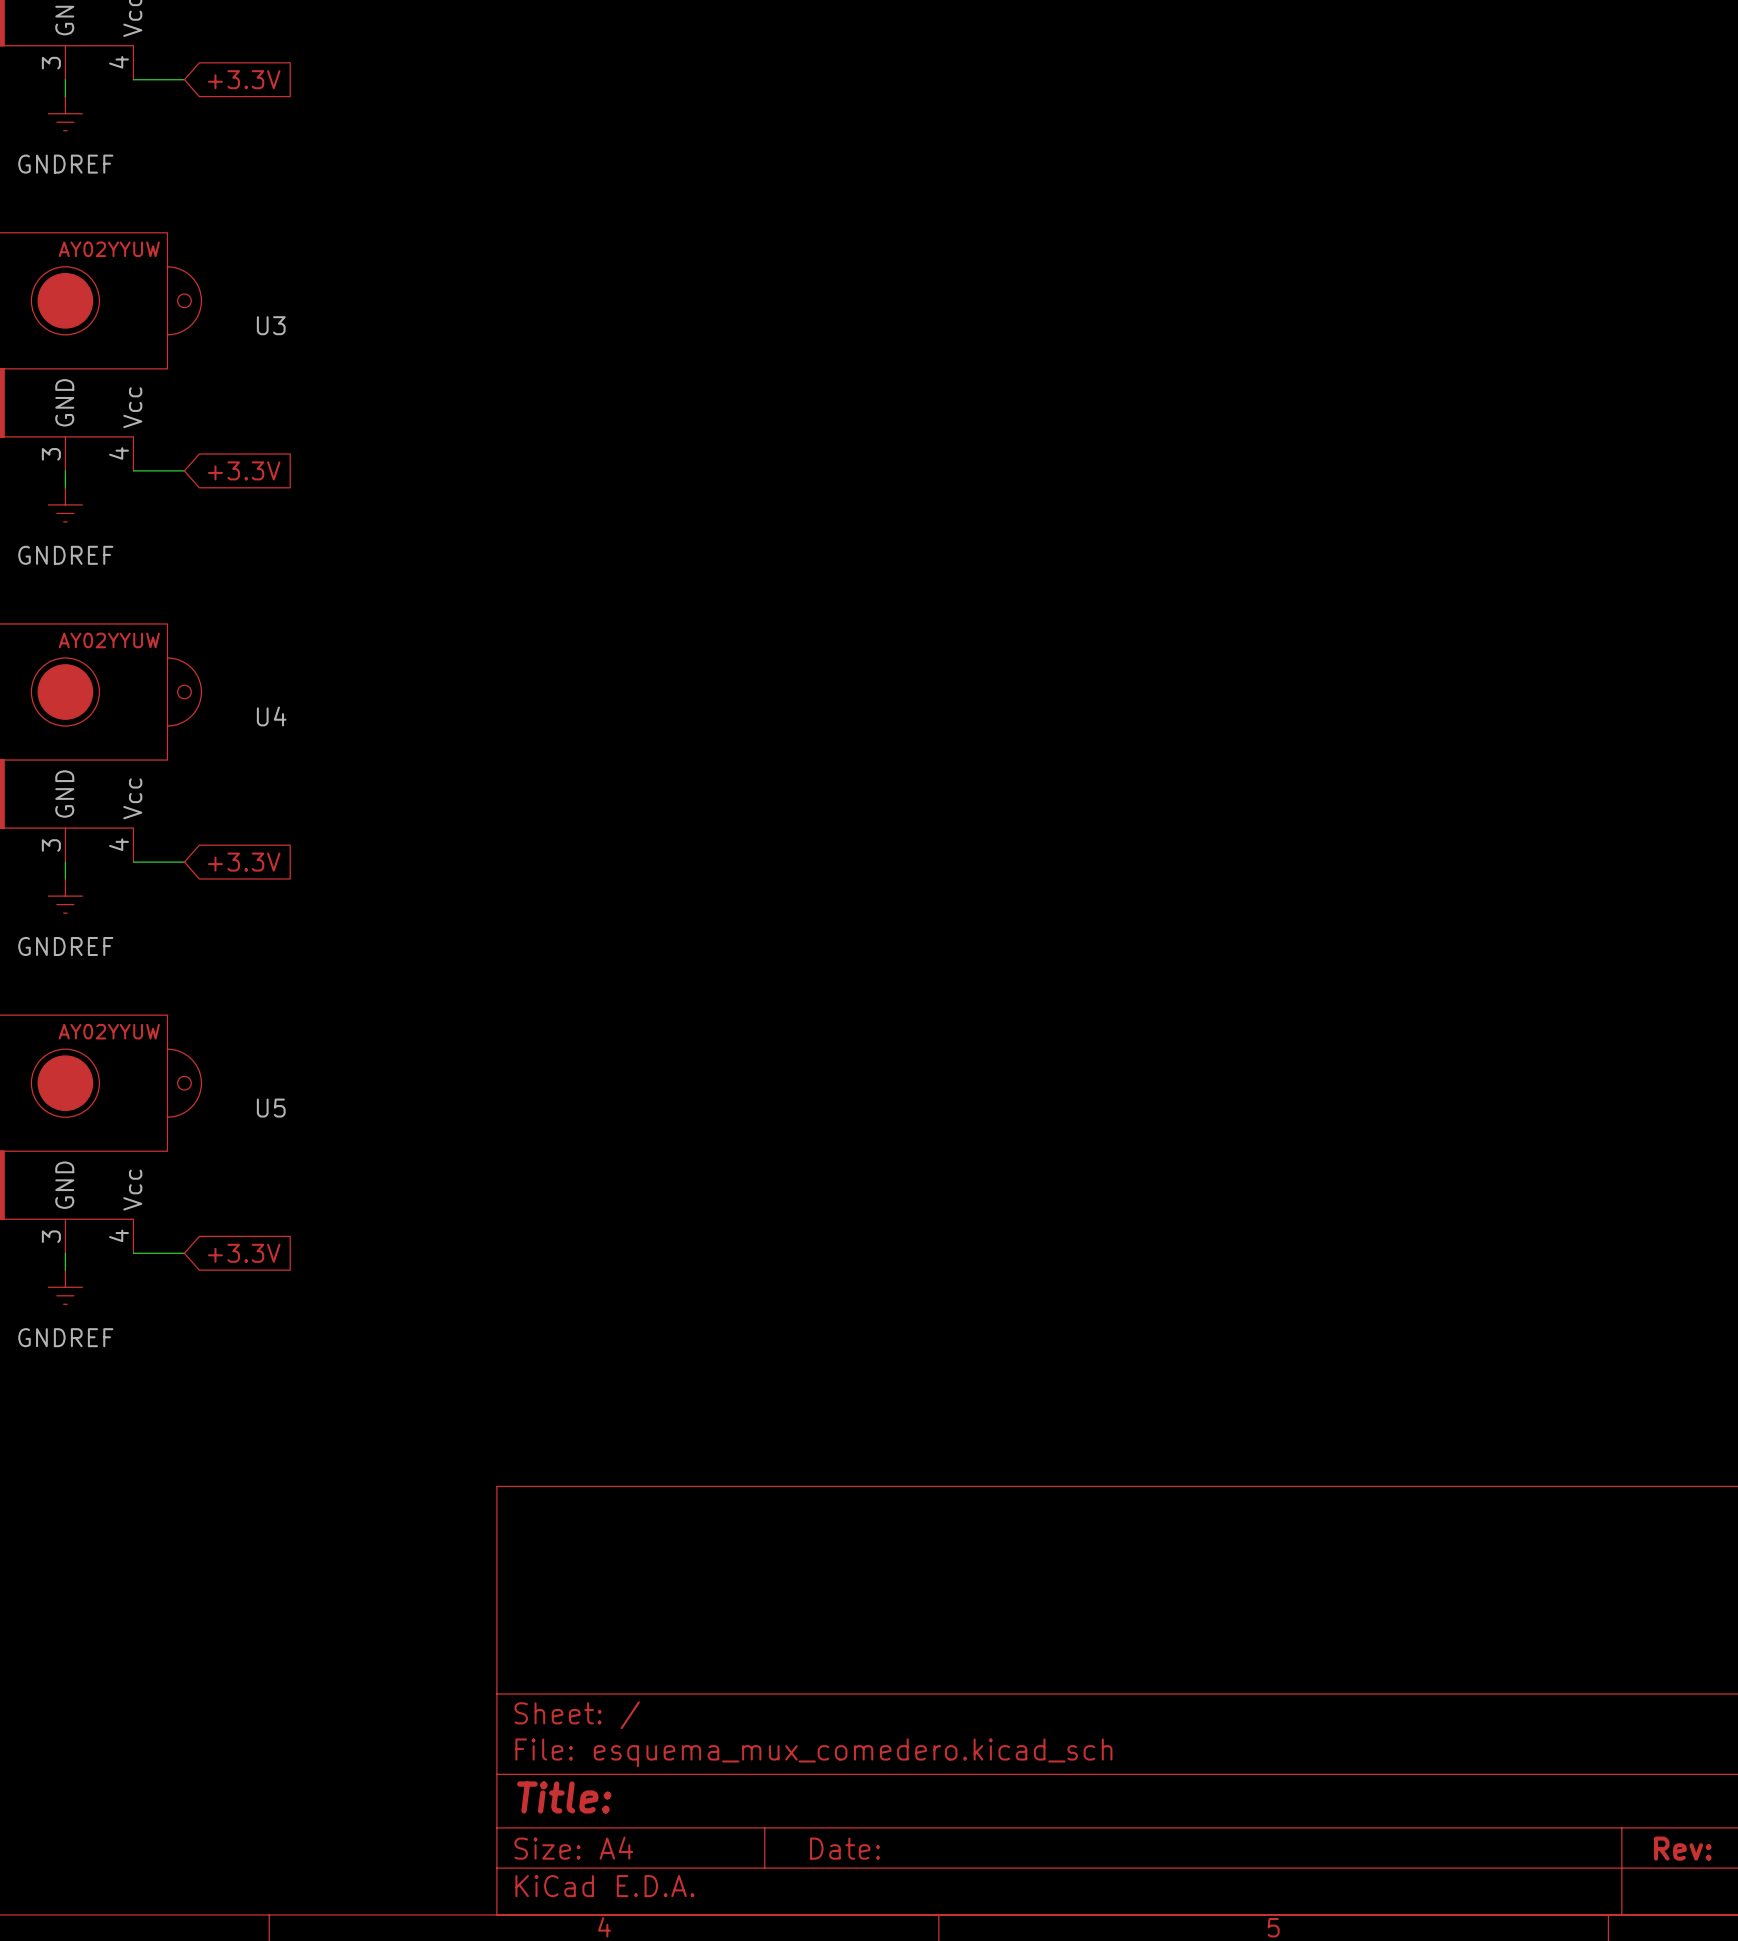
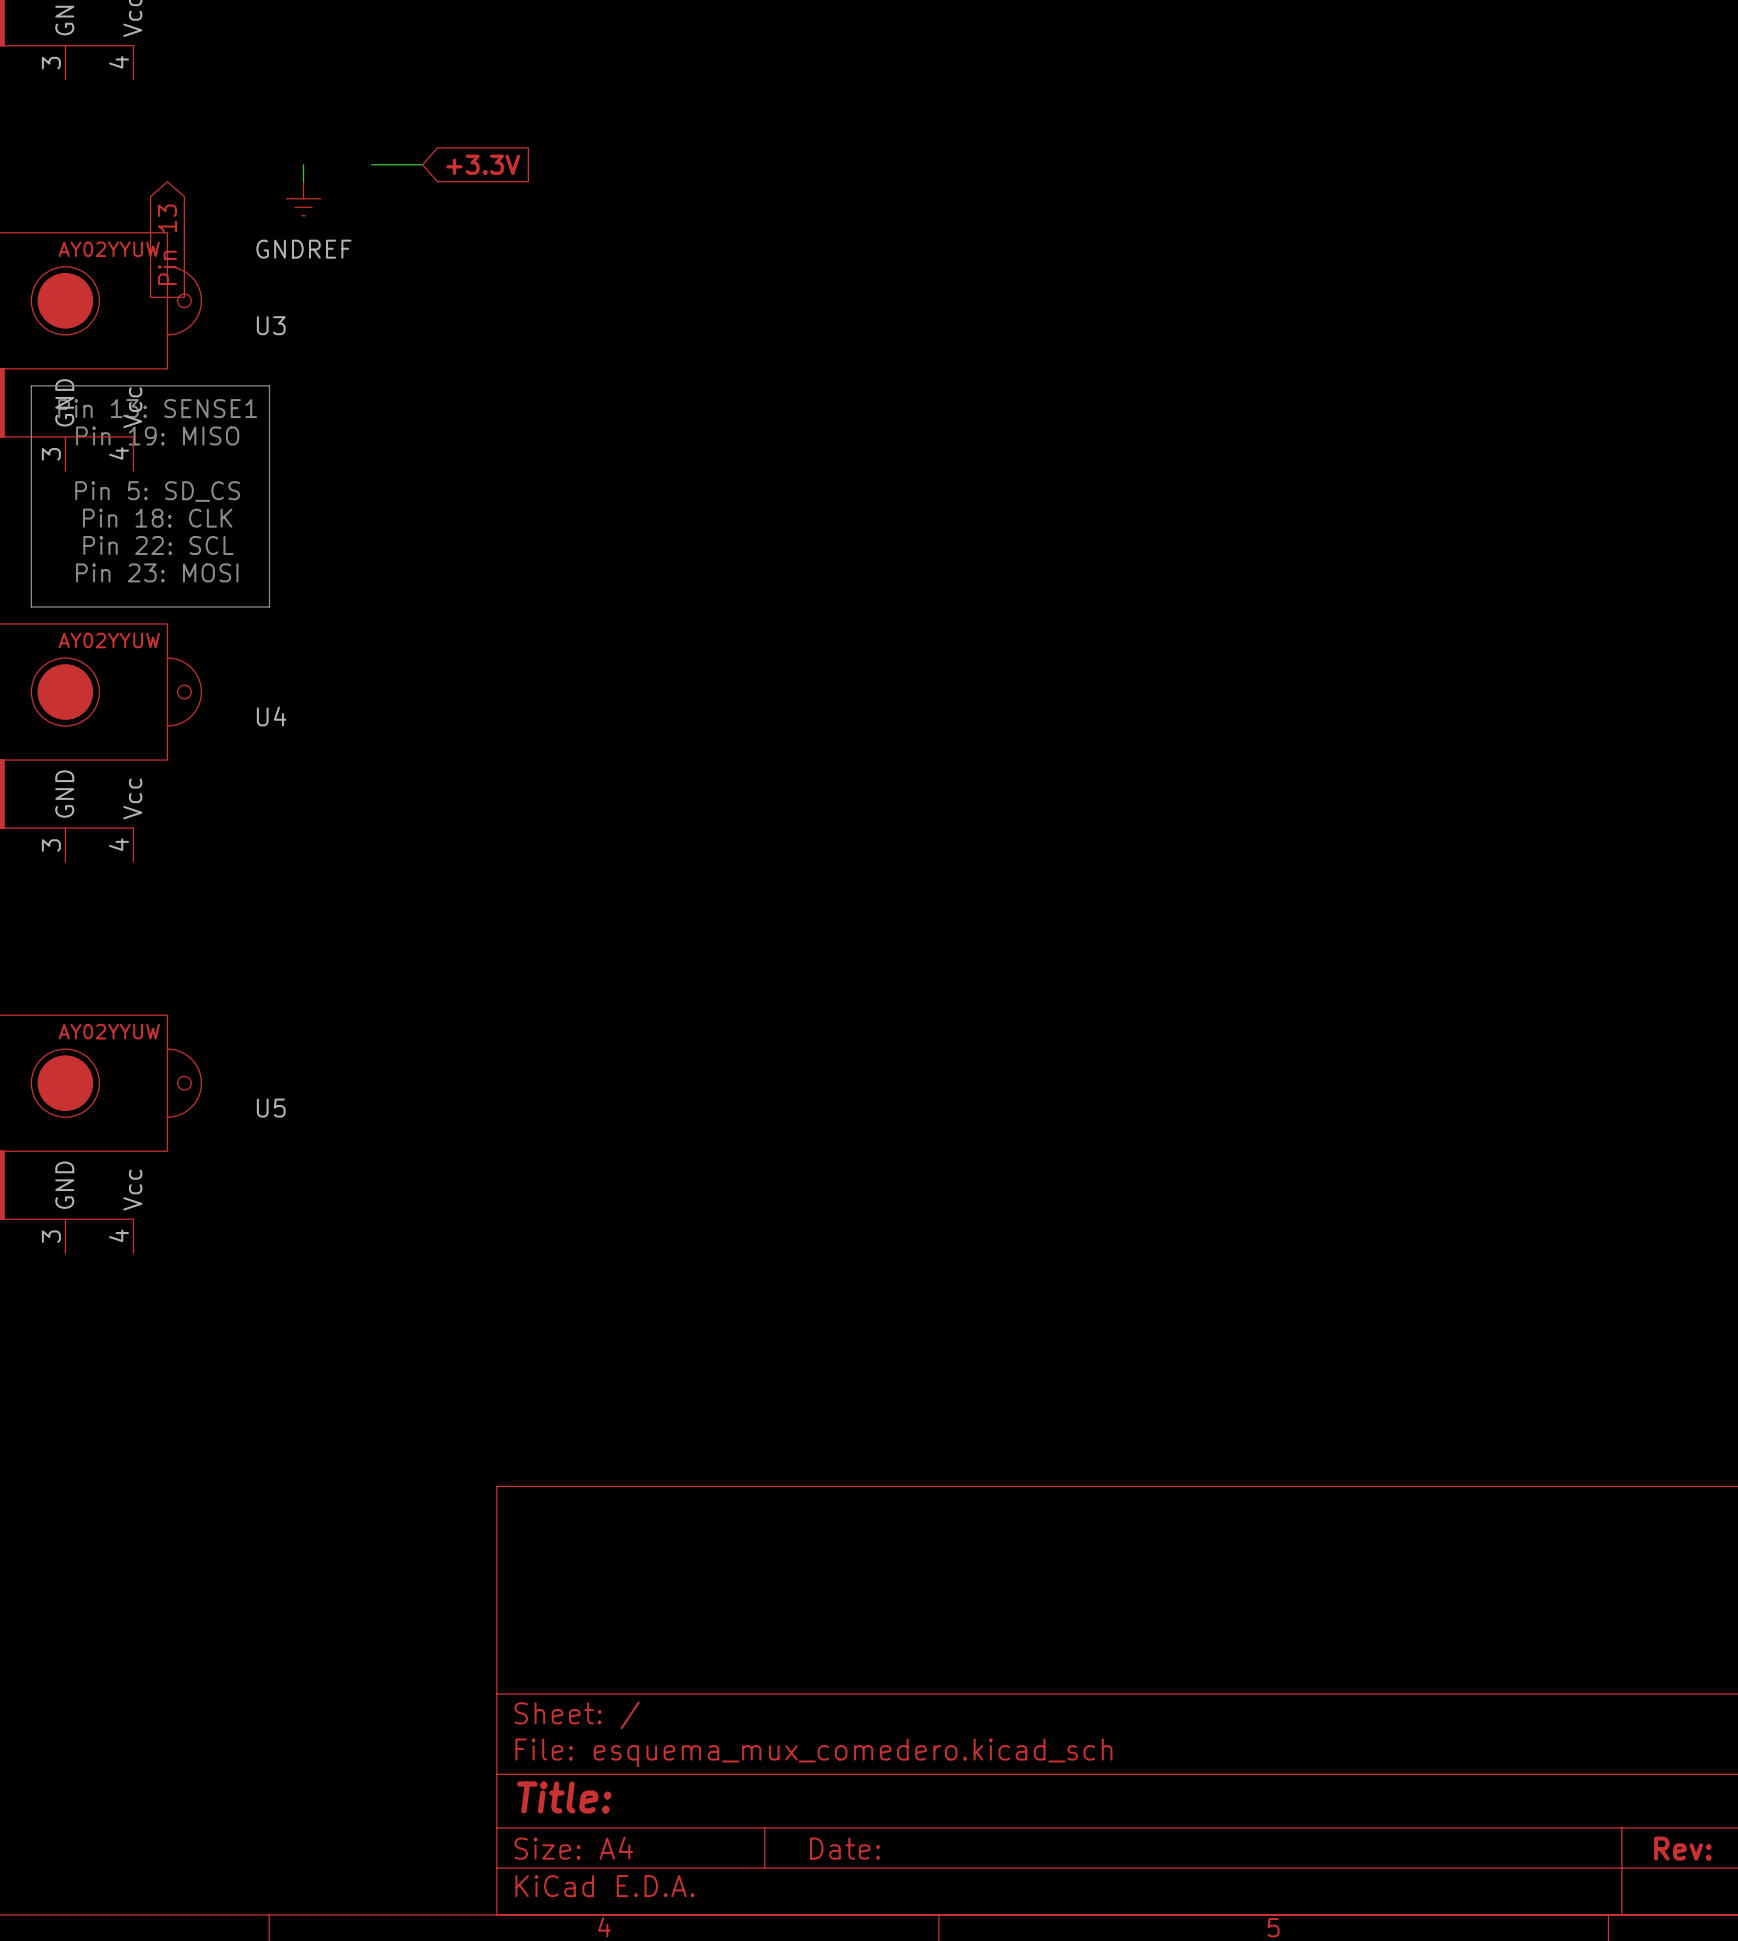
wire: (65, 79) (65, 96) -> (303, 164) (303, 181)
wire: (133, 79) (184, 79) -> (371, 164) (422, 164)
global label: +3.3V (244, 79) -> none
power symbol: GNDREF (65, 113) -> none
global label: none -> +3.3V (483, 164)
power symbol: none -> GNDREF (303, 198)
global label: none -> Pin 13 (167, 244)
bus: none -> (31, 385) (269, 385) (269, 606) (31, 606) (31, 385)
text: none -> Pin 13: SENSE1 (157, 408)
text: none -> Pin 19: MISO (157, 435)
wire: (65, 470) (65, 487) -> none
wire: (133, 470) (184, 470) -> none
global label: +3.3V (244, 470) -> none
text: none -> Pin 5: SD_CS (157, 491)
power symbol: GNDREF (65, 504) -> none
text: none -> Pin 18: CLK (157, 518)
text: none -> Pin 22: SCL (158, 545)
text: none -> Pin 23: MOSI (157, 572)
wire: (65, 862) (65, 879) -> none
wire: (133, 862) (184, 862) -> none
global label: +3.3V (244, 862) -> none
power symbol: GNDREF (65, 896) -> none
wire: (65, 1253) (65, 1270) -> none
wire: (133, 1253) (184, 1253) -> none
global label: +3.3V (244, 1253) -> none
power symbol: GNDREF (65, 1287) -> none

